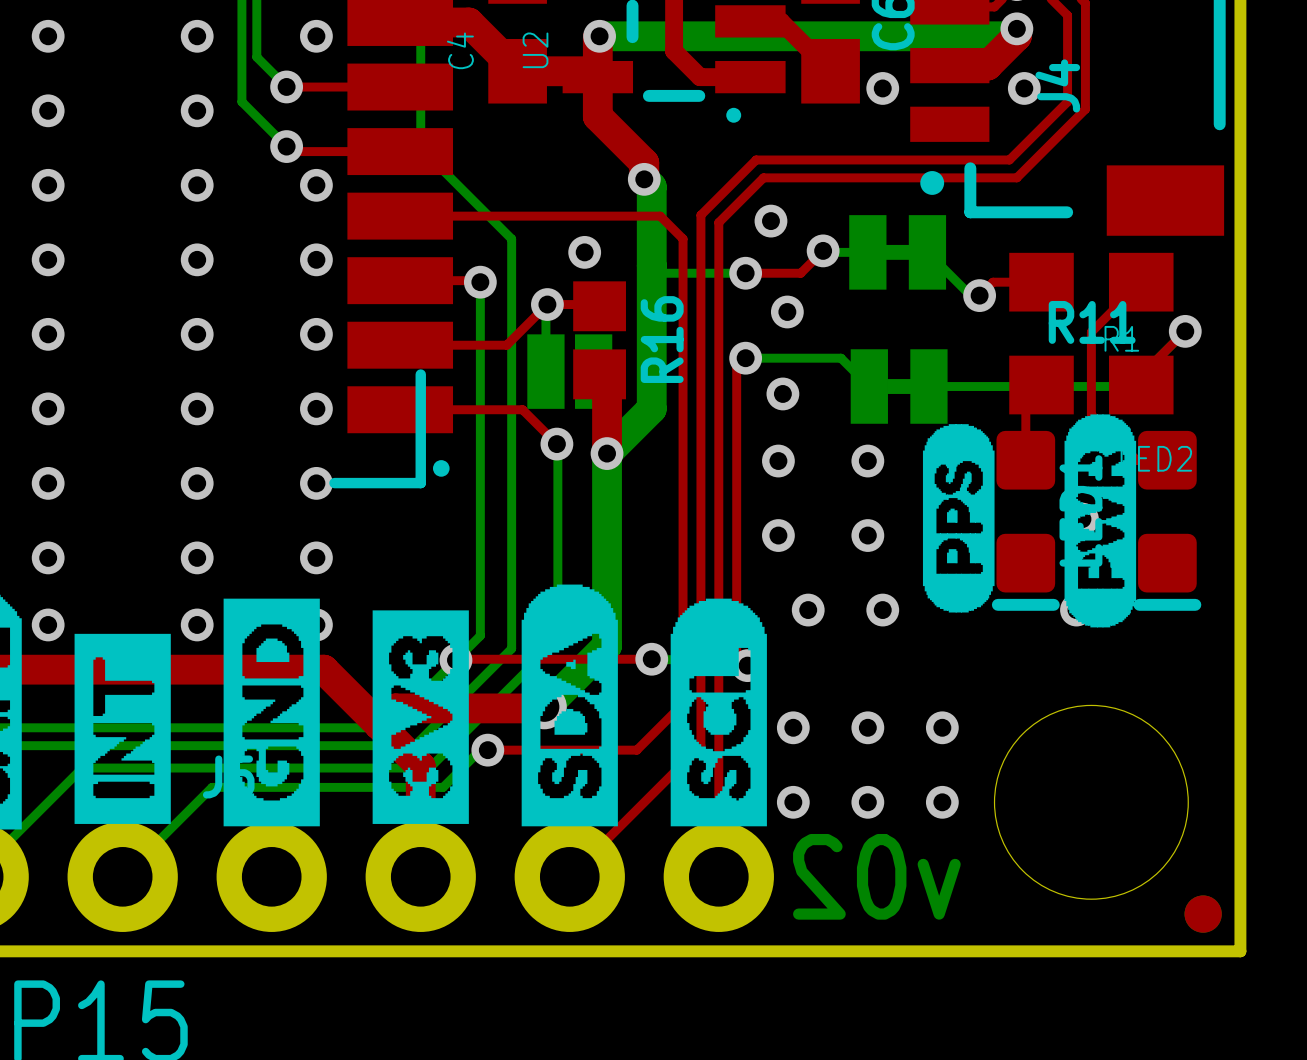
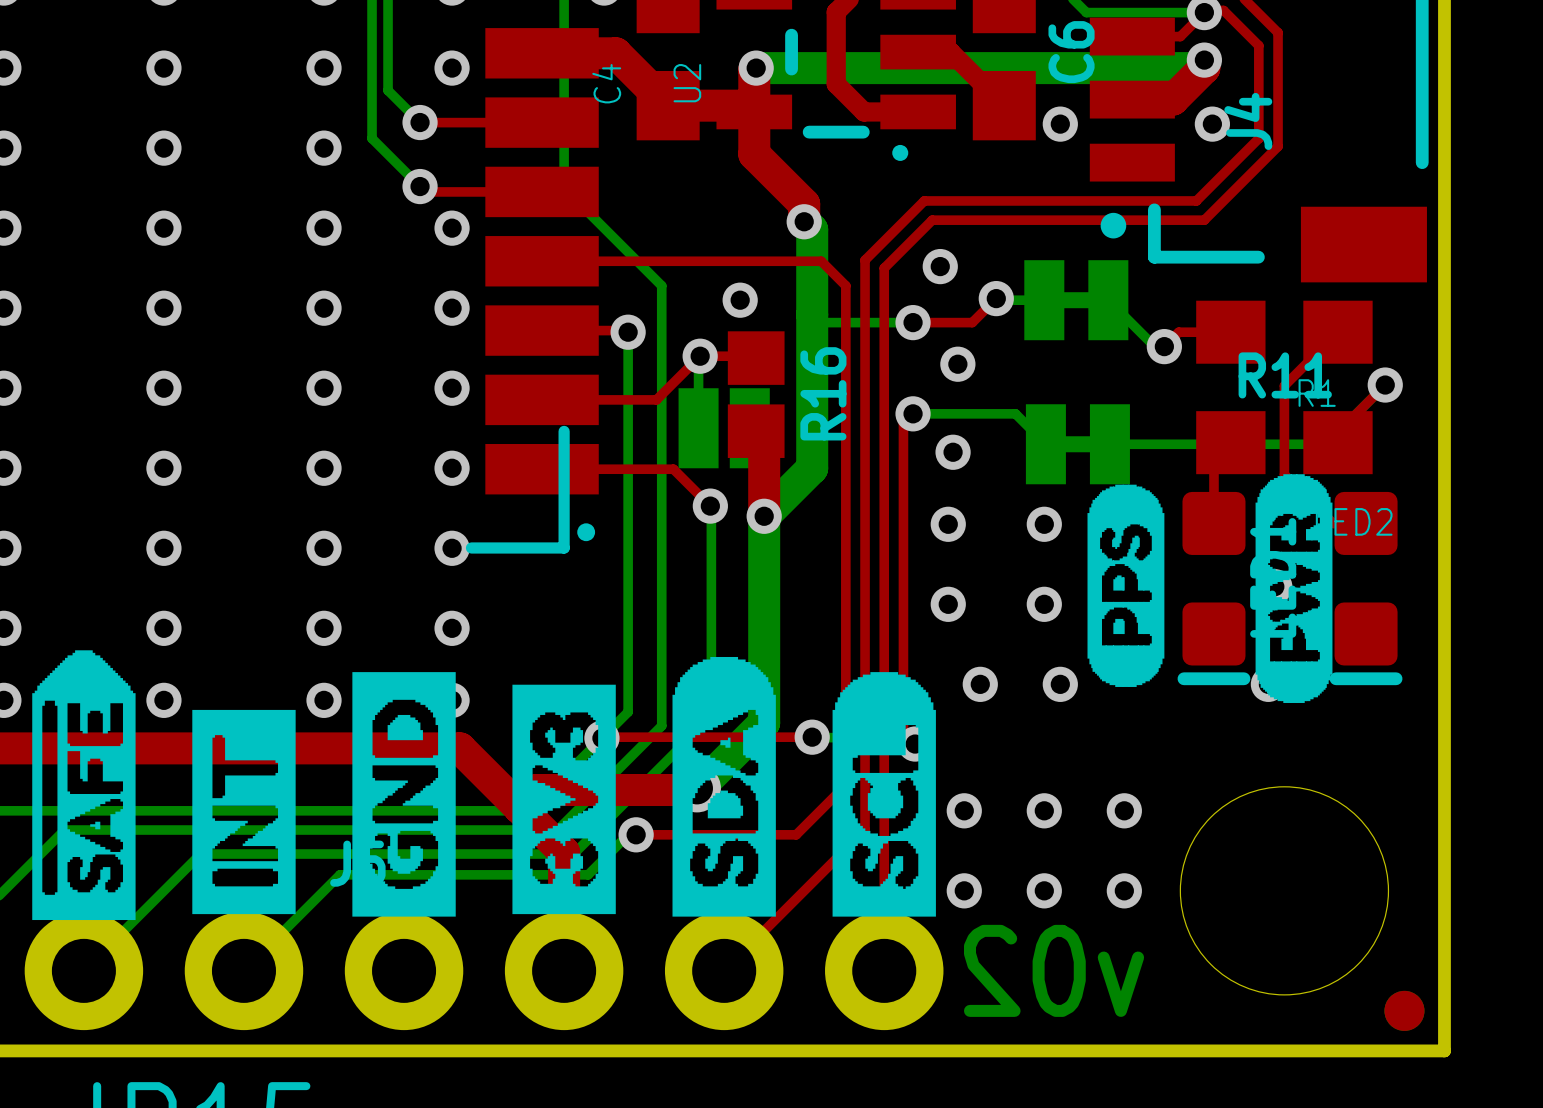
part footprint: [850, 349, 948, 424] -> [1025, 404, 1130, 485]
drawing position: (958, 518) -> (1125, 585)

